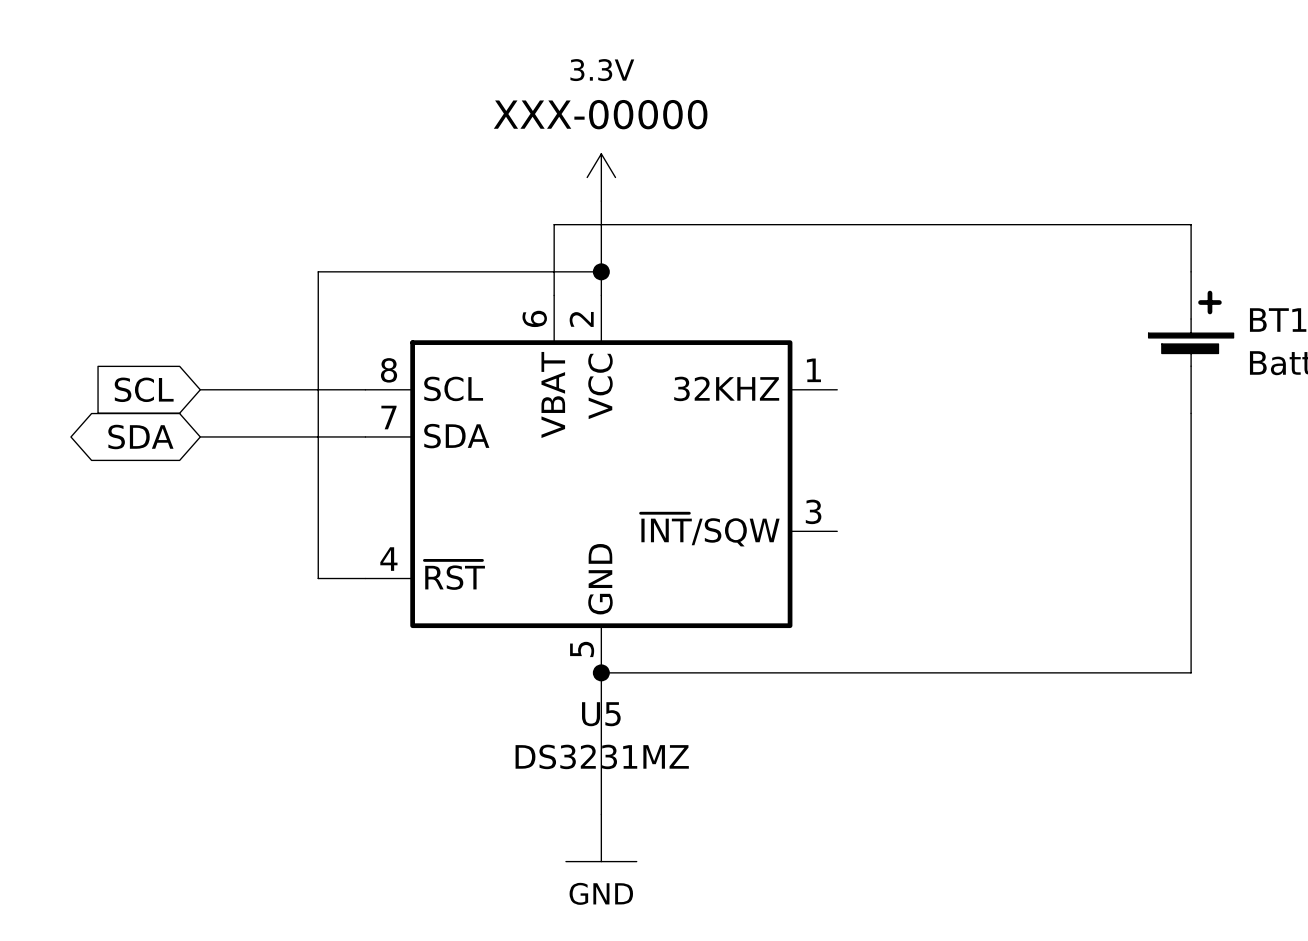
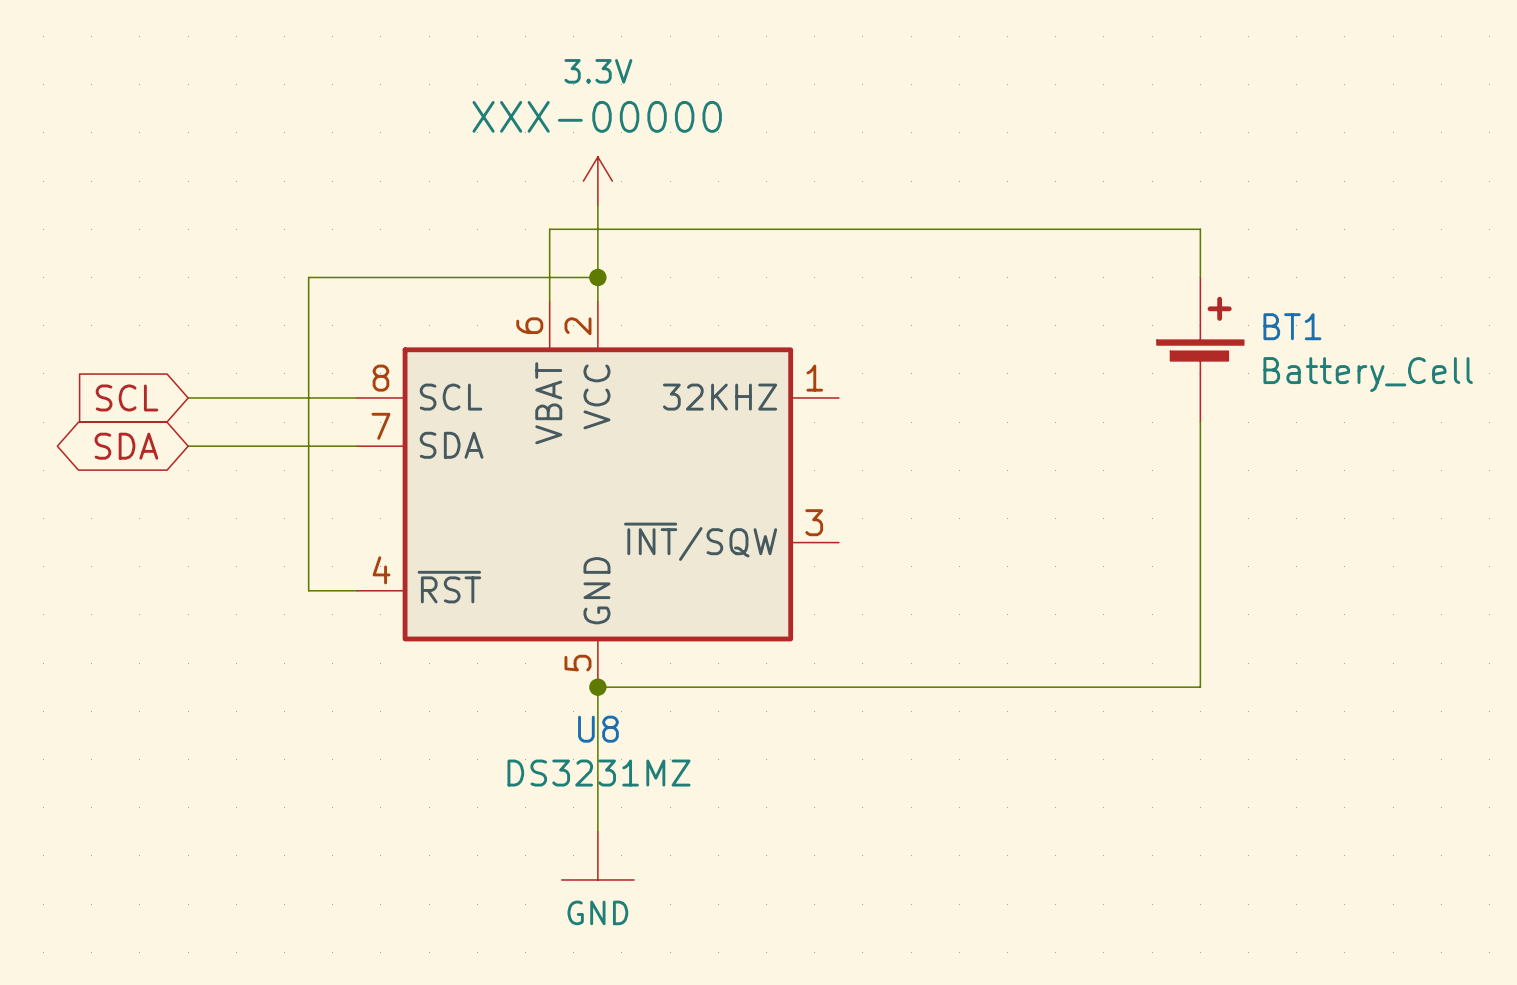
U5 name: U5 (601, 714) -> U8 (598, 729)

